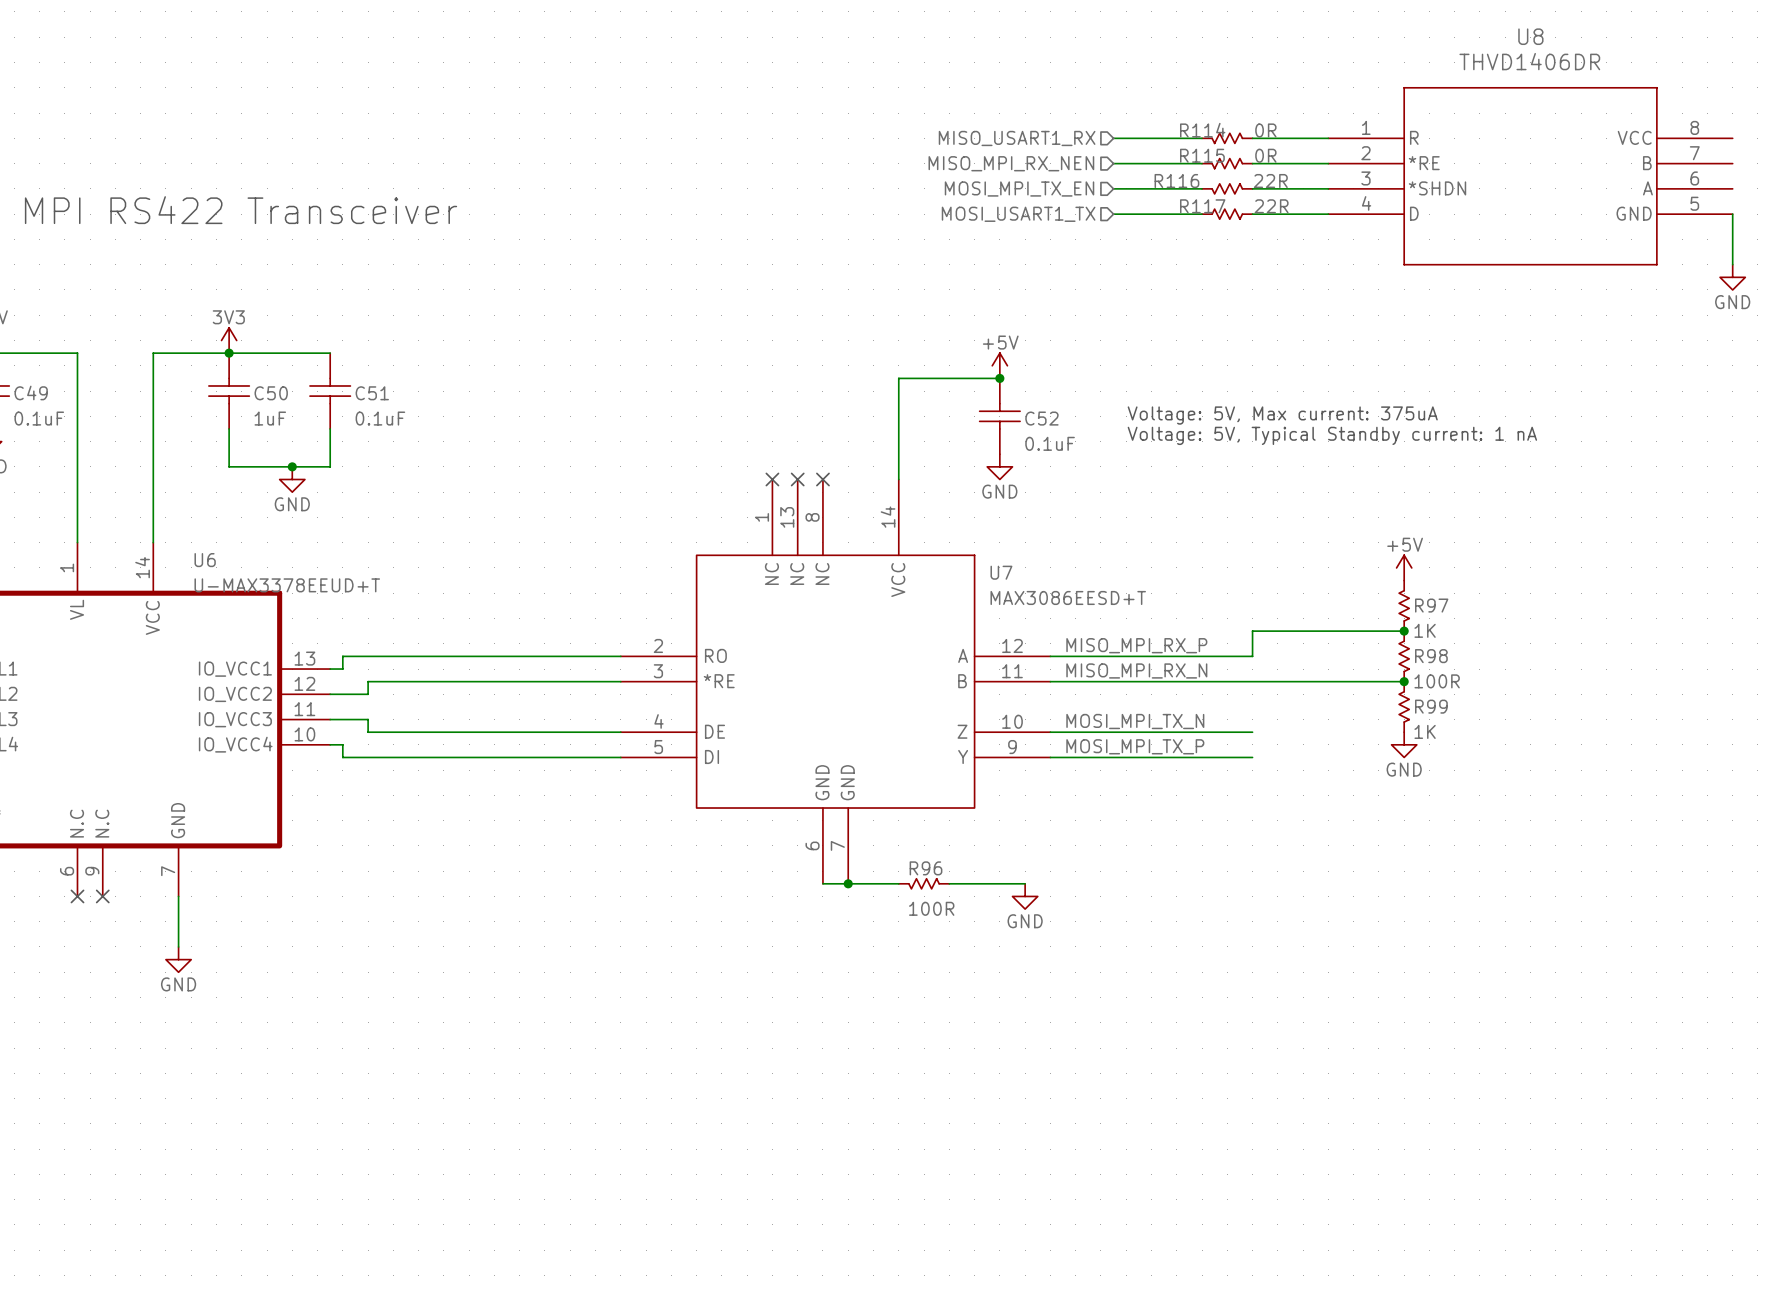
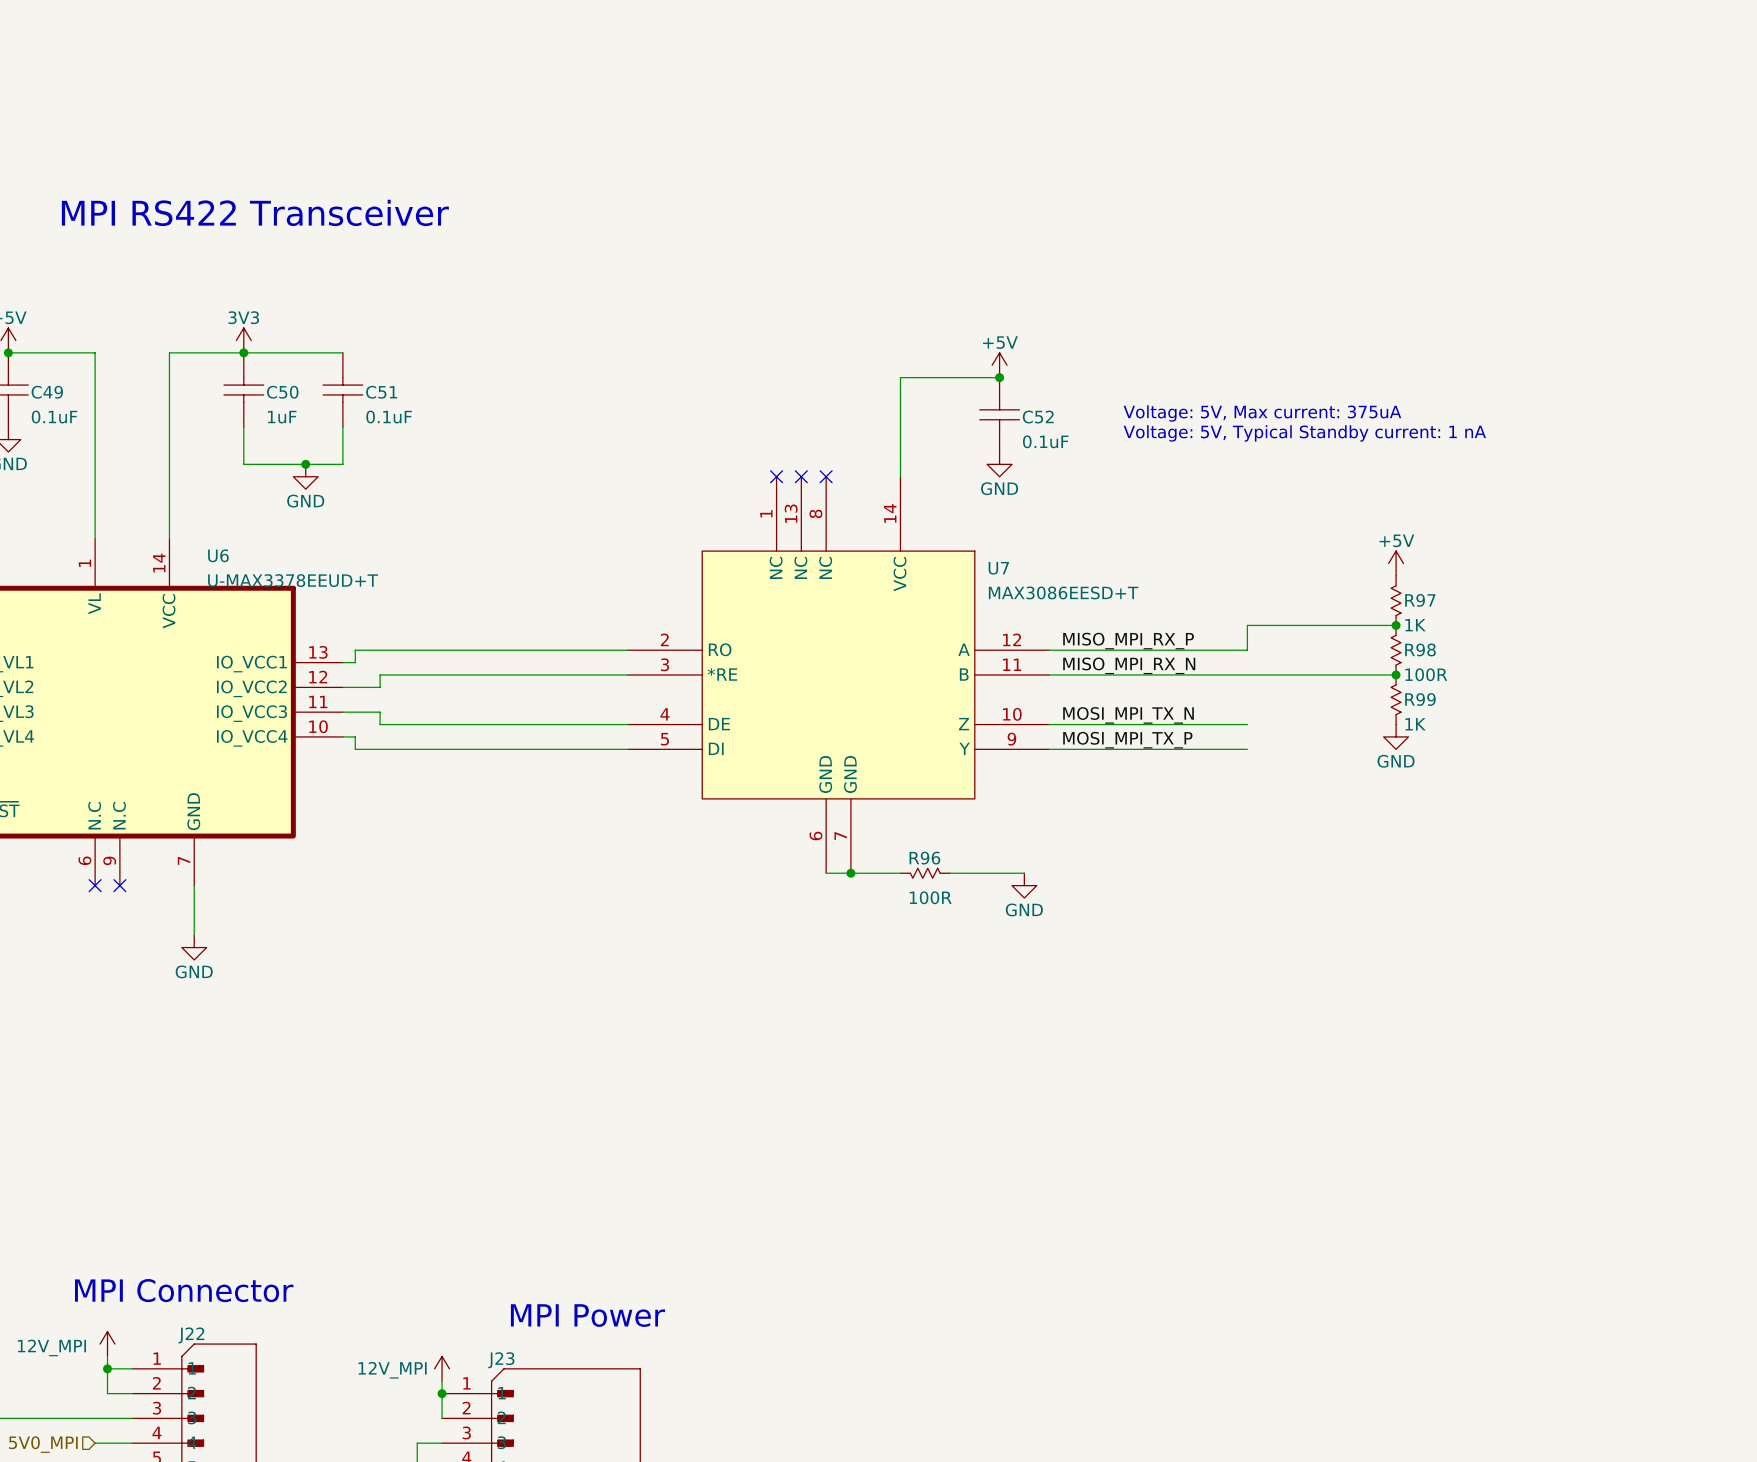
hierarchical label: MISO_USART1_RX (1017, 138) -> none
wire: (1113, 138) (1202, 138) -> none
R114: (1227, 138) -> none
wire: (1252, 138) (1328, 138) -> none
hierarchical label: MISO_MPI_RX_NEN (1011, 163) -> none
wire: (1113, 163) (1202, 163) -> none
R115: (1227, 163) -> none
wire: (1252, 163) (1328, 163) -> none
U8: THVD1406DR (1530, 176) -> none
wire: (1113, 188) (1202, 188) -> none
R116: (1227, 188) -> none
wire: (1252, 188) (1328, 188) -> none
hierarchical label: MOSI_MPI_TX_EN (1019, 189) -> none
hierarchical label: MOSI_USART1_TX (1018, 214) -> none
wire: (1113, 214) (1202, 214) -> none
R117: (1227, 214) -> none
wire: (1252, 214) (1328, 214) -> none
wire: (1732, 214) (1732, 264) -> none
power symbol: GND (1732, 277) -> none

